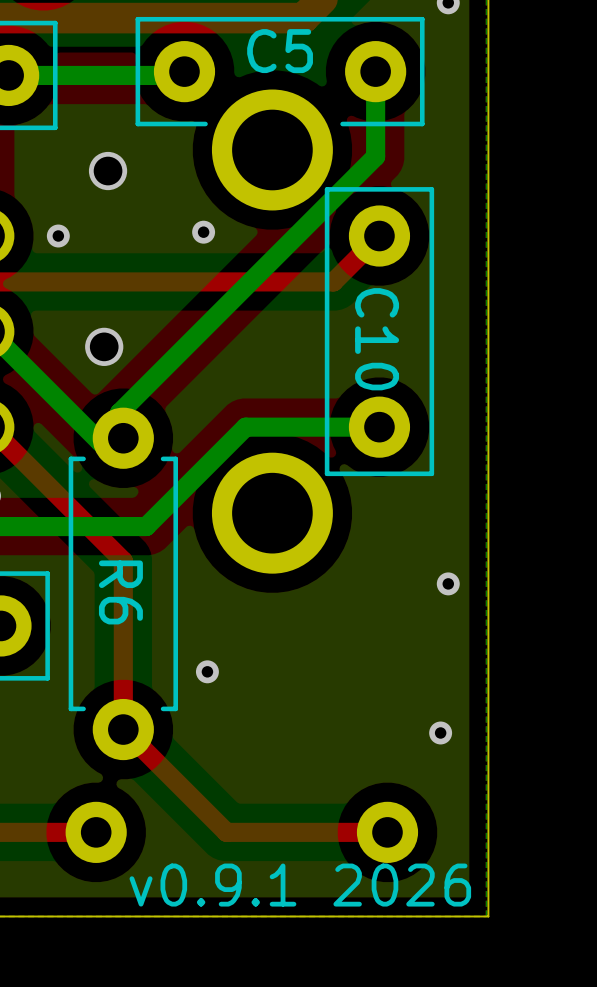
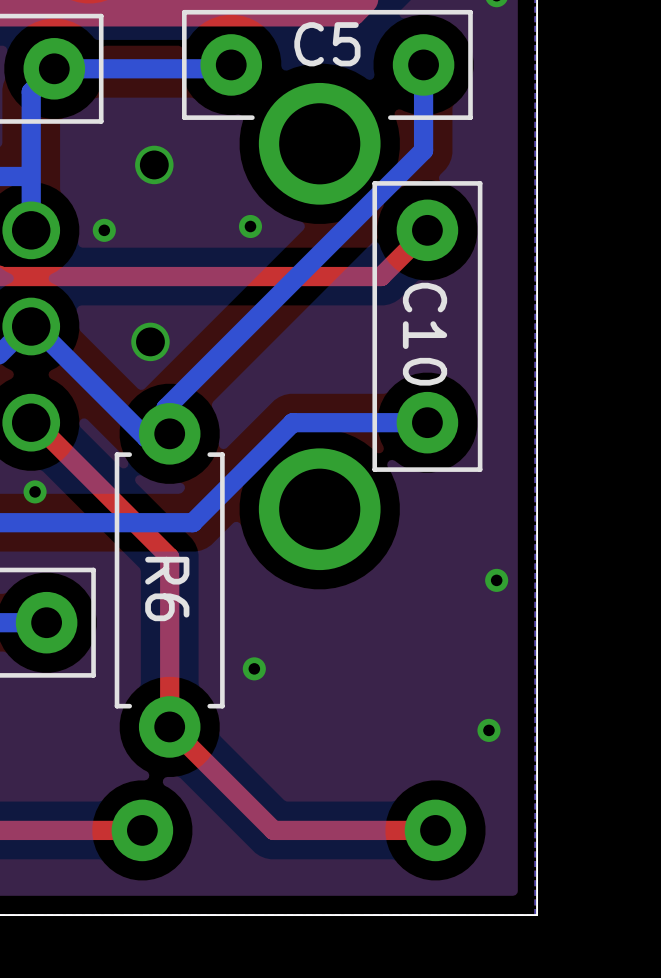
text: v0.9.1 2026 (300, 885) -> none

